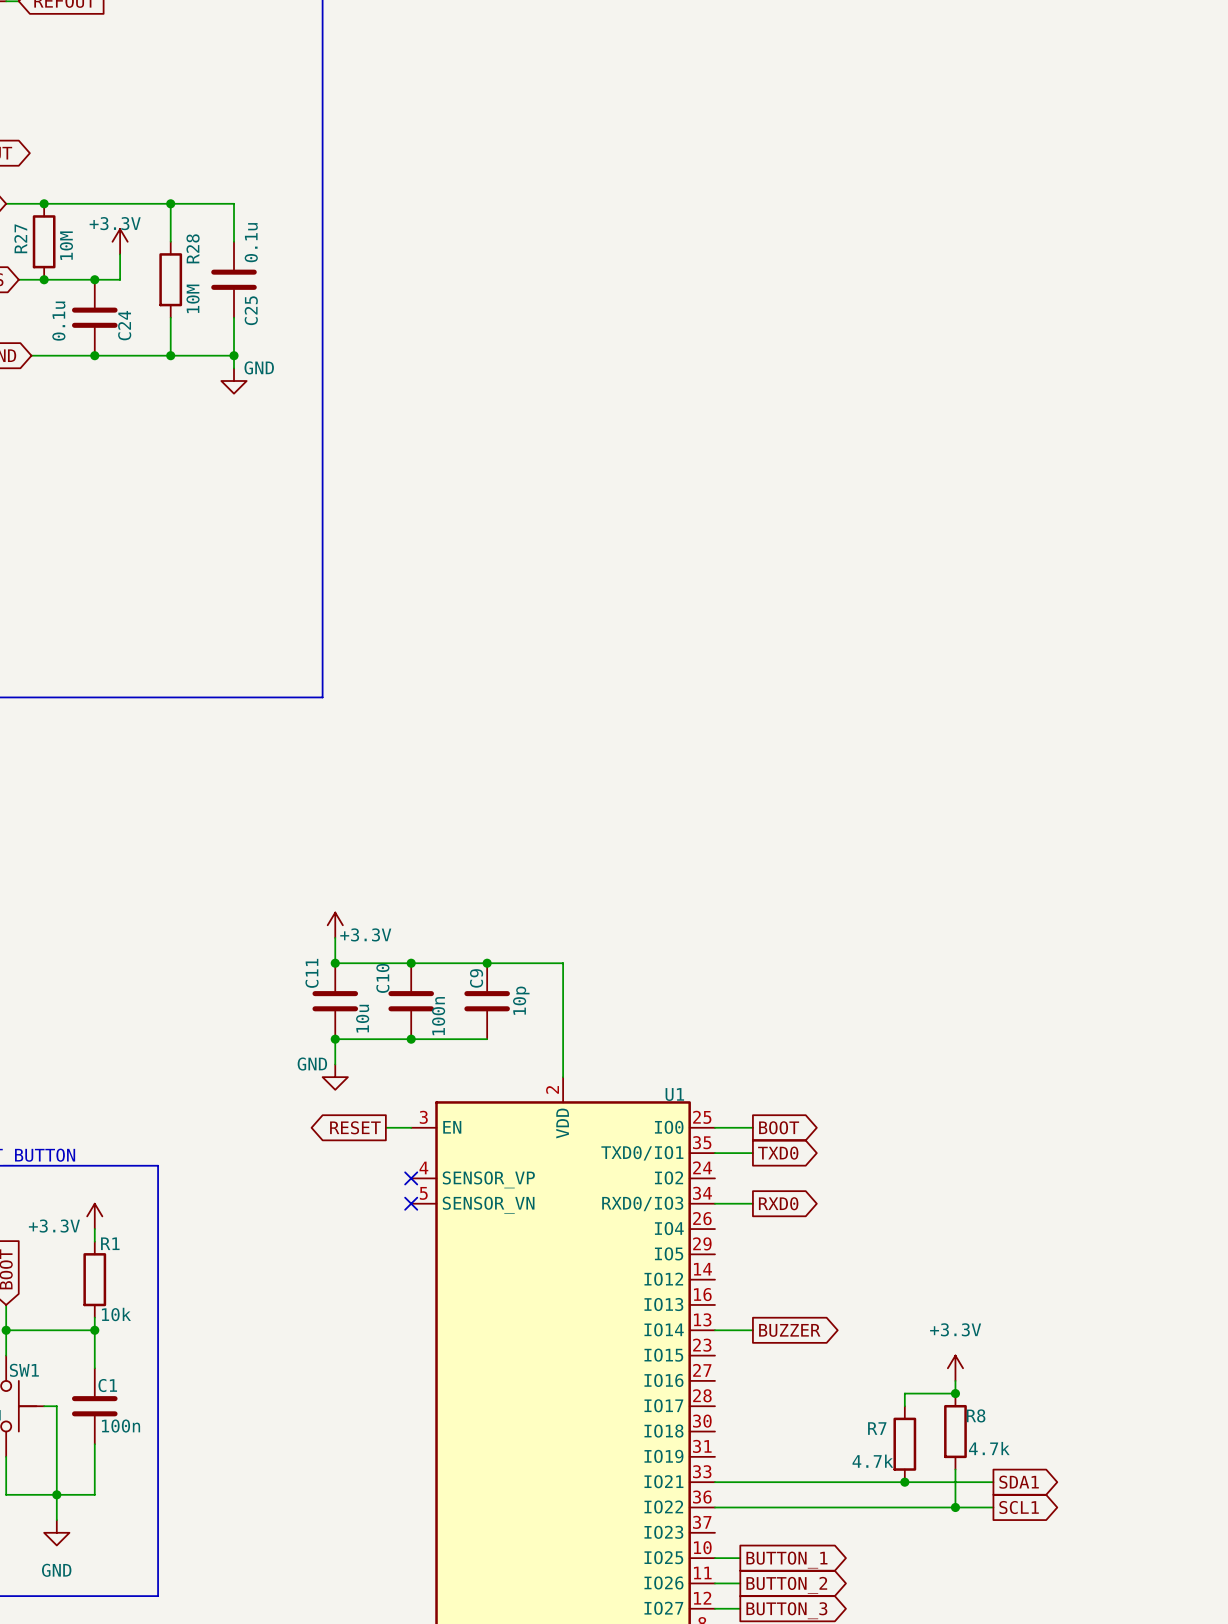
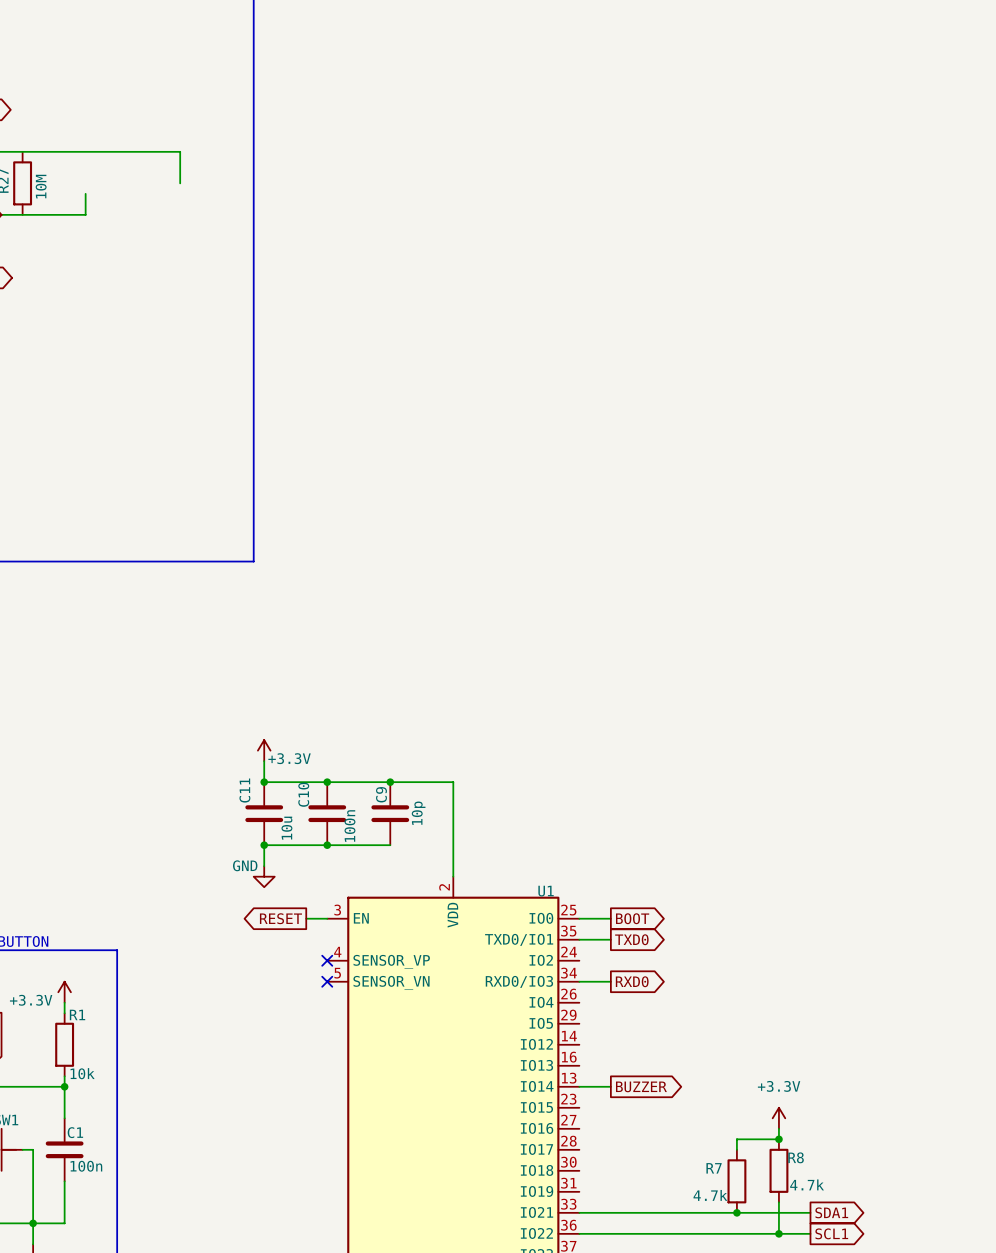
junction: (44, 203) -> none
wire: (170, 203) (170, 241) -> none
junction: (170, 203) -> none
power symbol: +3.3V (120, 241) -> none
junction: (44, 279) -> none
junction: (94, 279) -> none
R28: 10M (170, 279) -> none
C25: 0.1u (234, 279) -> none
C24: 0.1u (94, 317) -> none
wire: (170, 317) (170, 355) -> none
wire: (234, 317) (234, 368) -> none
wire: (31, 355) (234, 355) -> none
junction: (94, 355) -> none
junction: (170, 355) -> none
junction: (234, 355) -> none
power symbol: GND (234, 381) -> none

